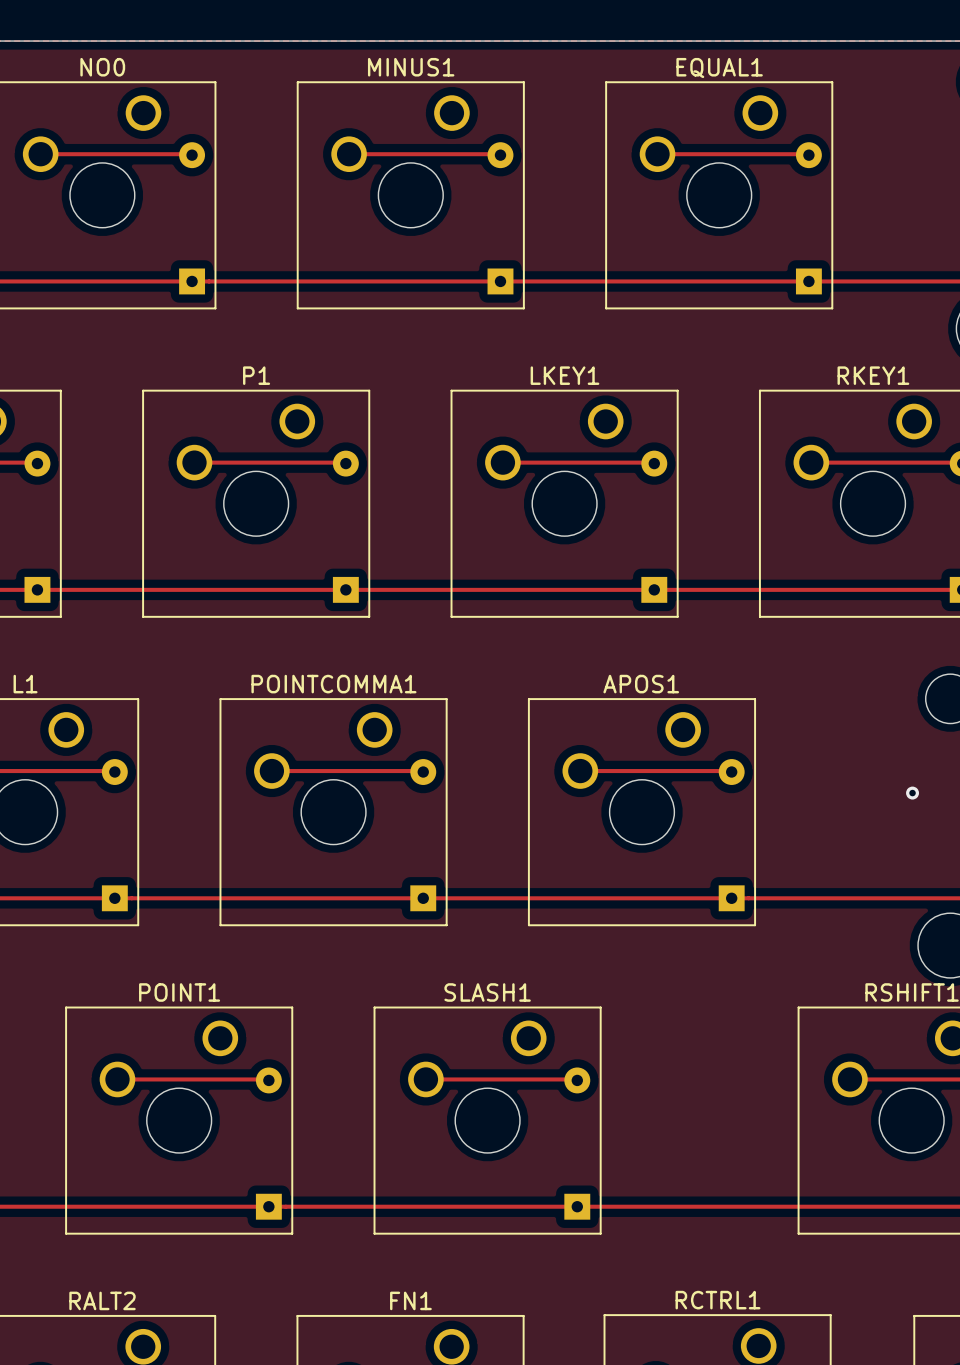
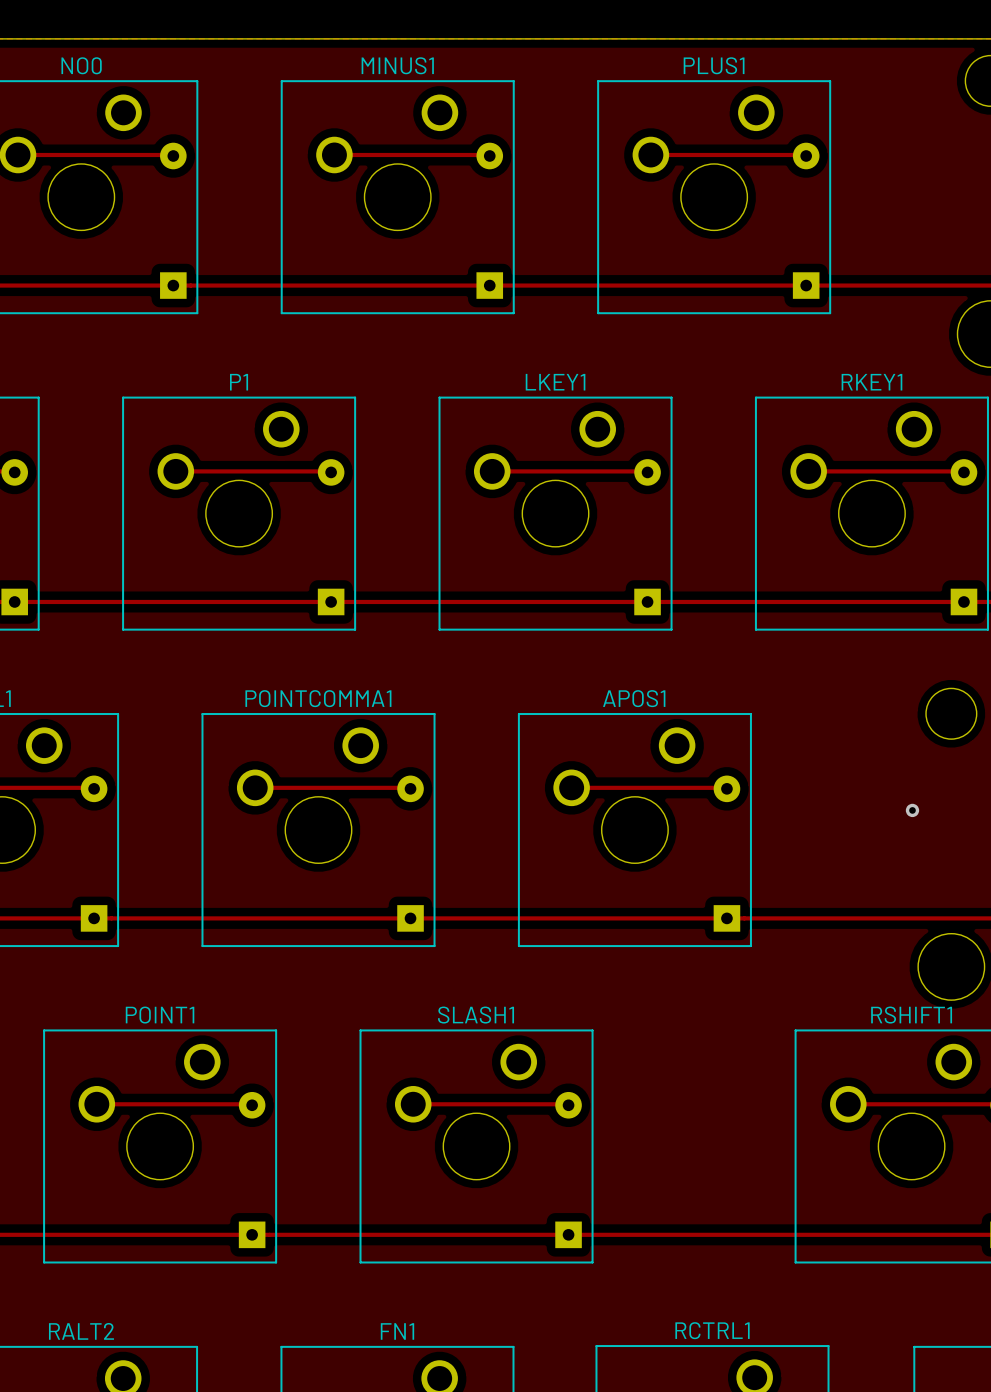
EQUAL1 name: EQUAL1 (719, 68) -> PLUS1 (714, 65)

